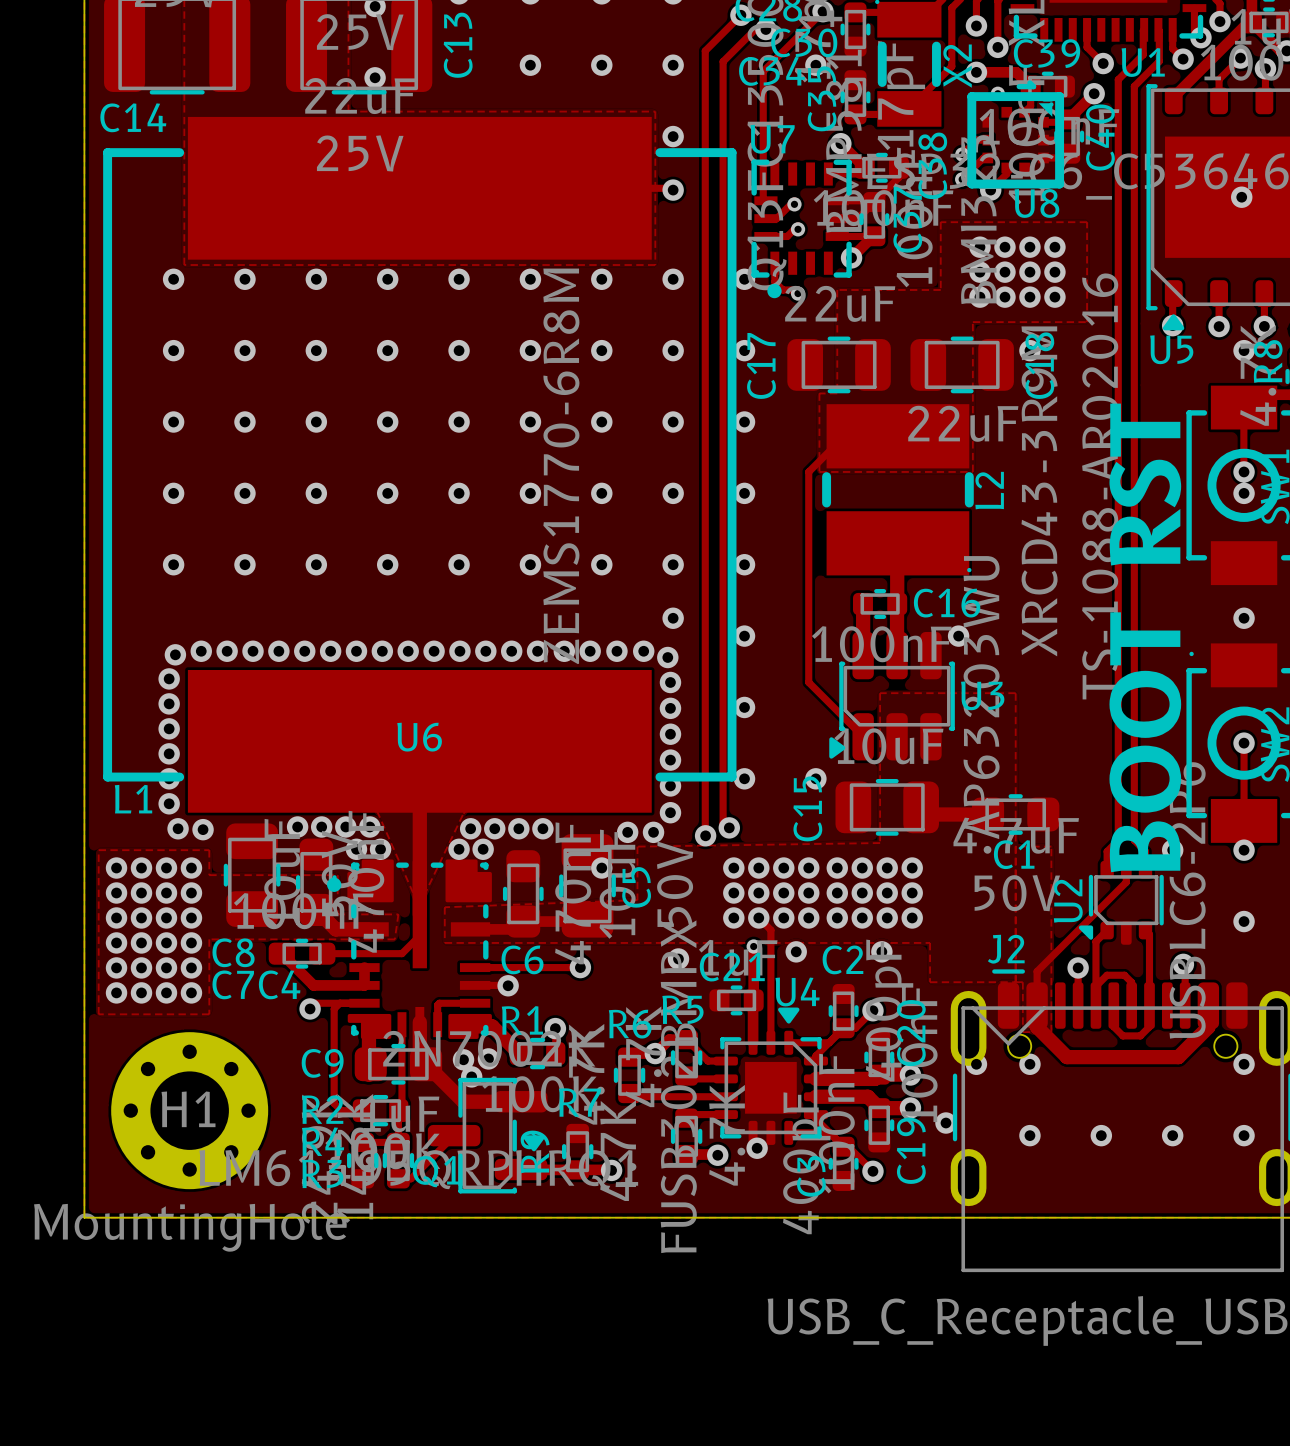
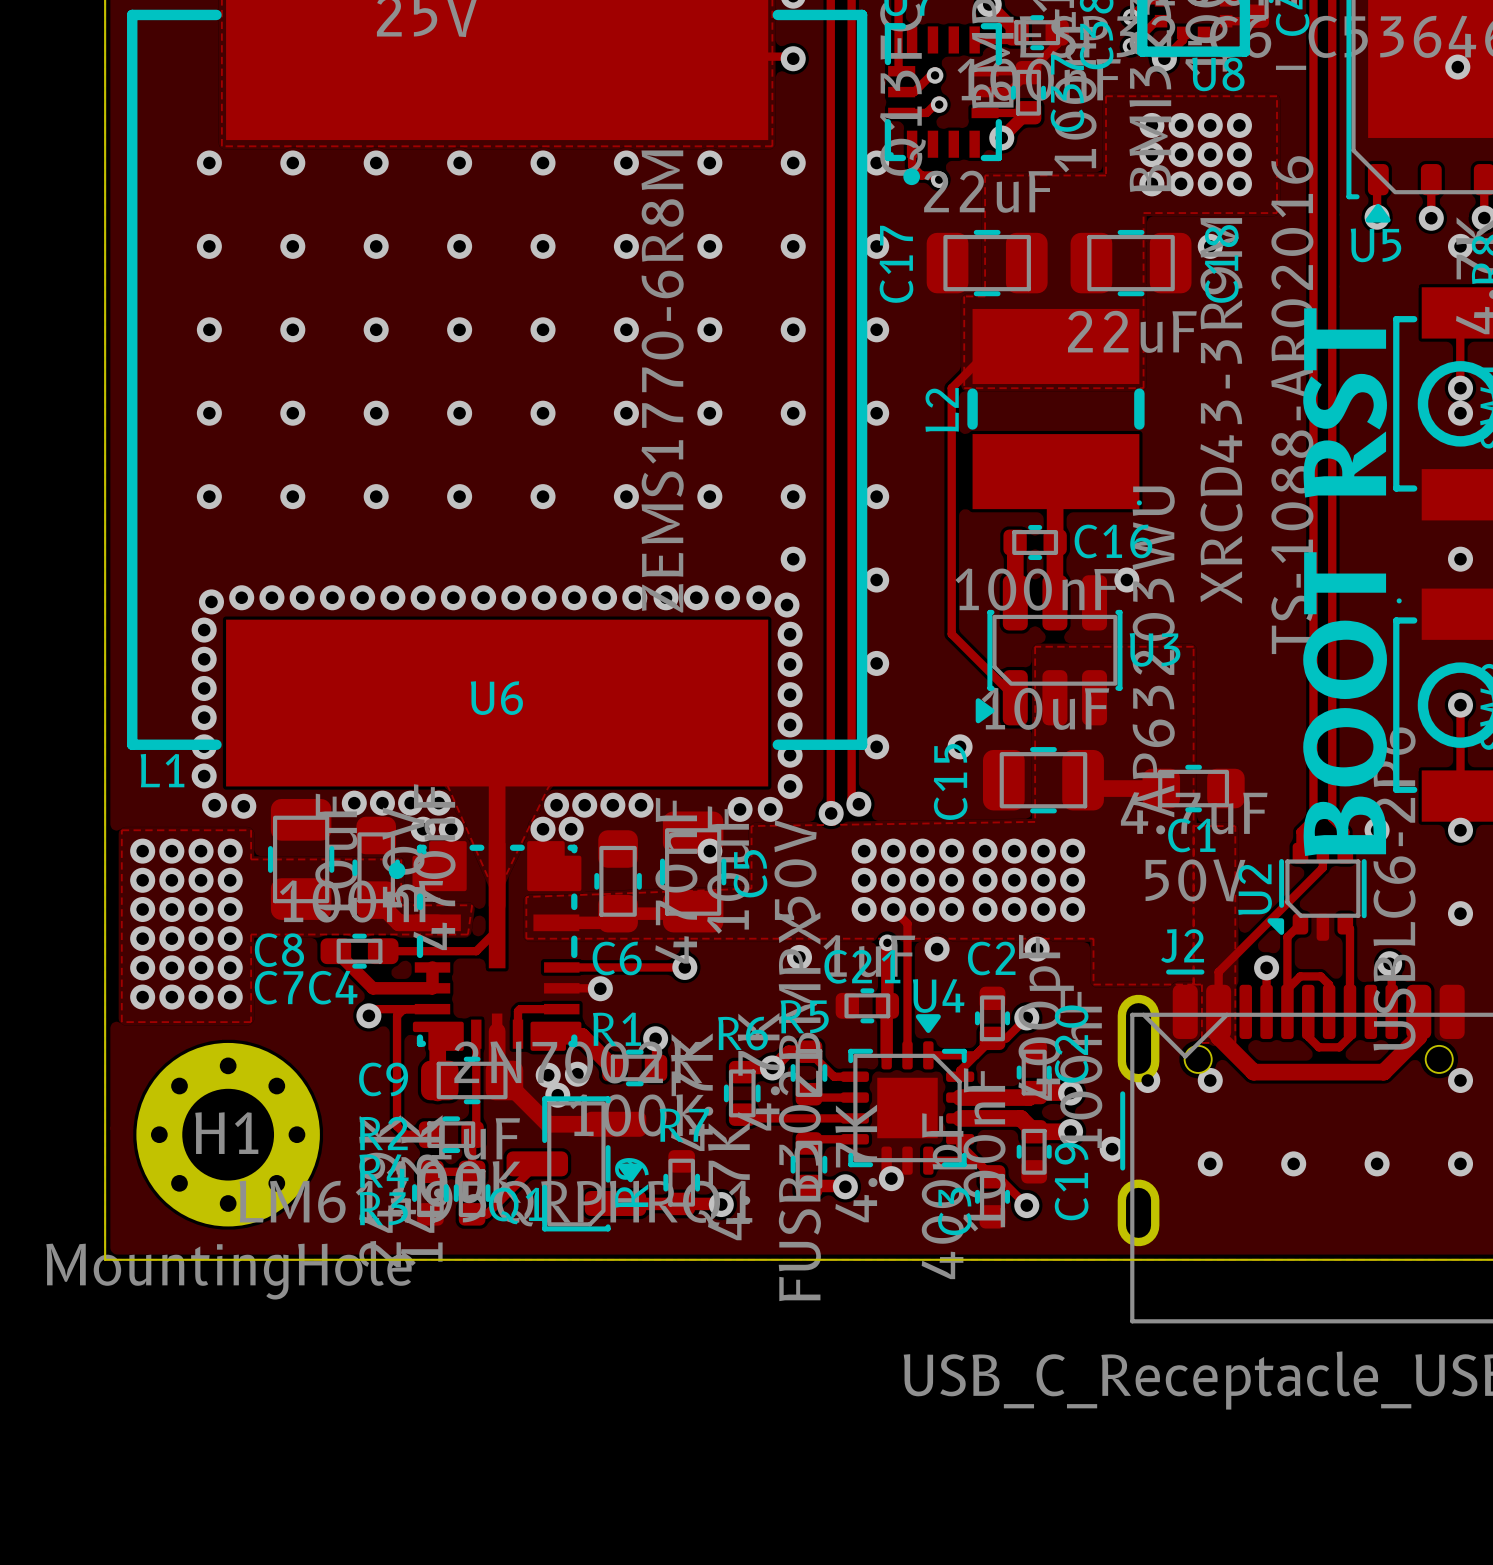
L2 name position: L2 (989, 490) -> L2 (942, 409)

